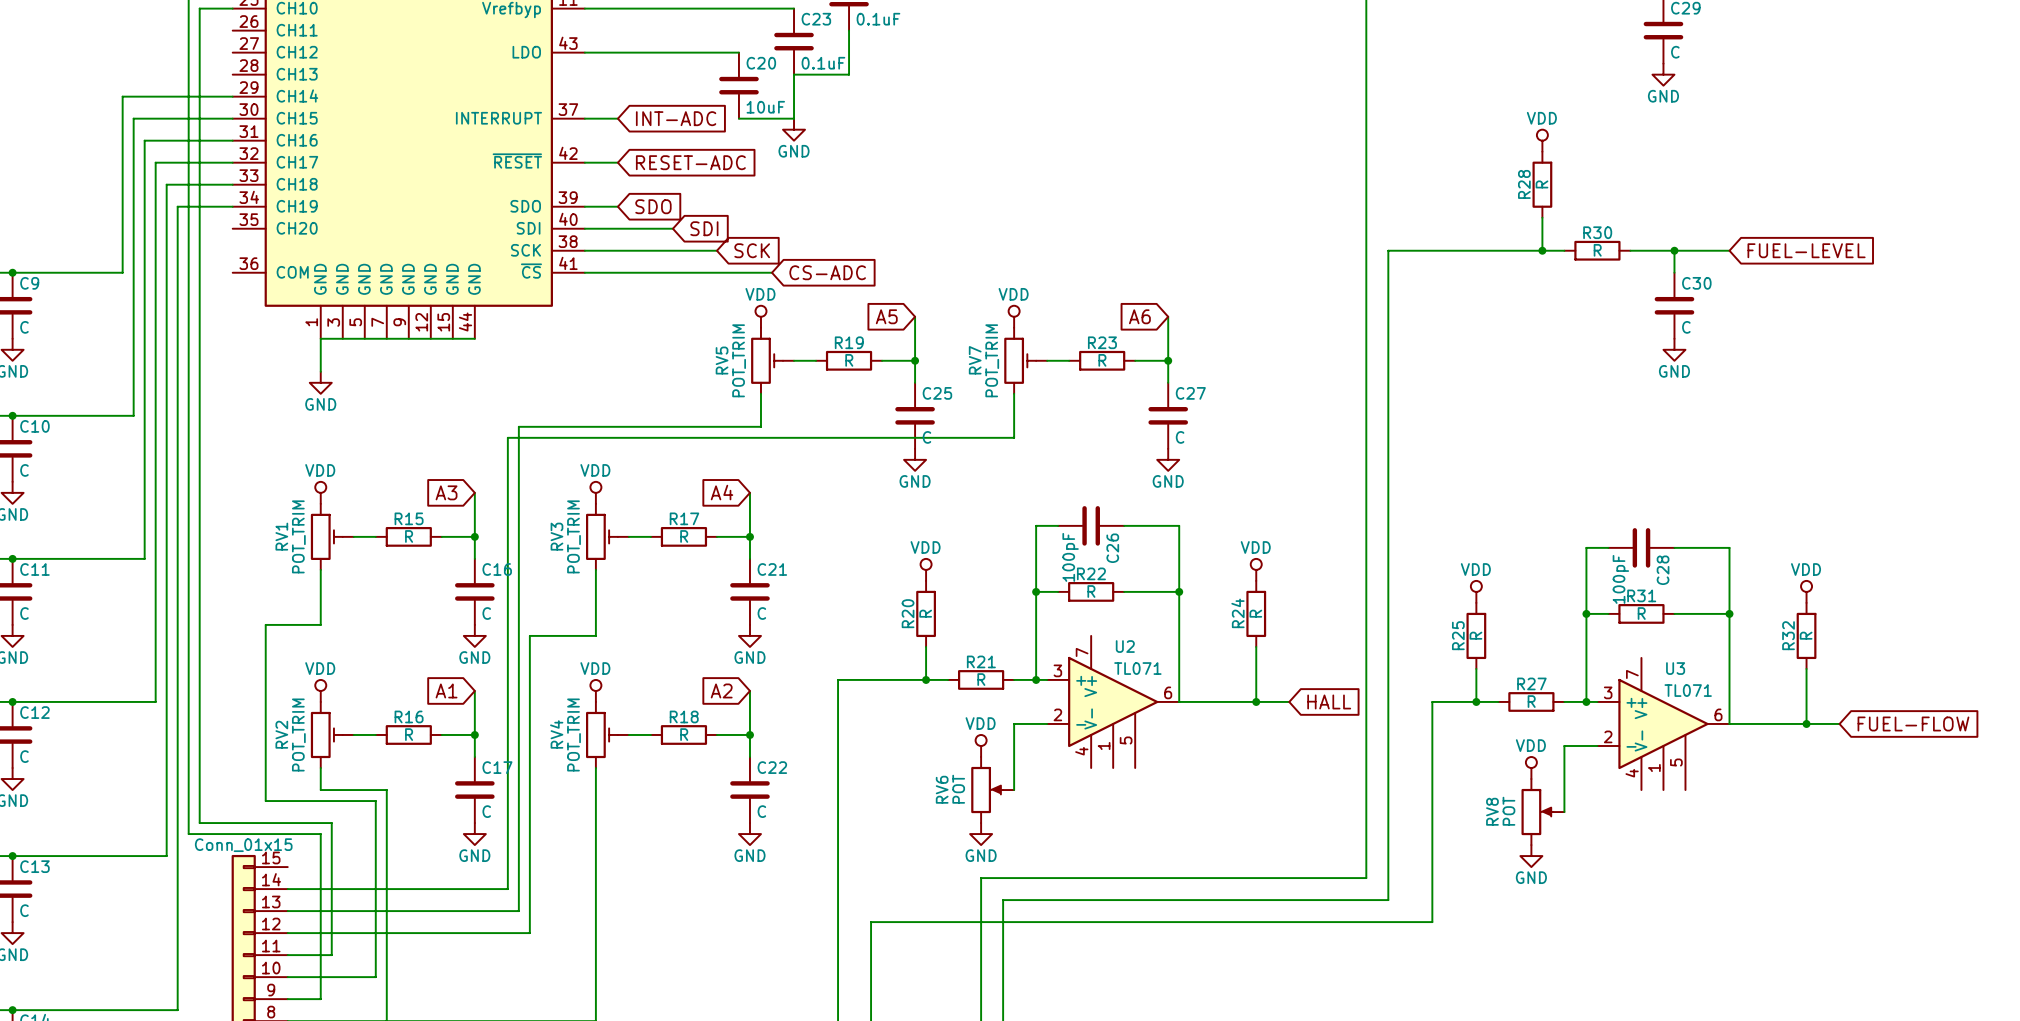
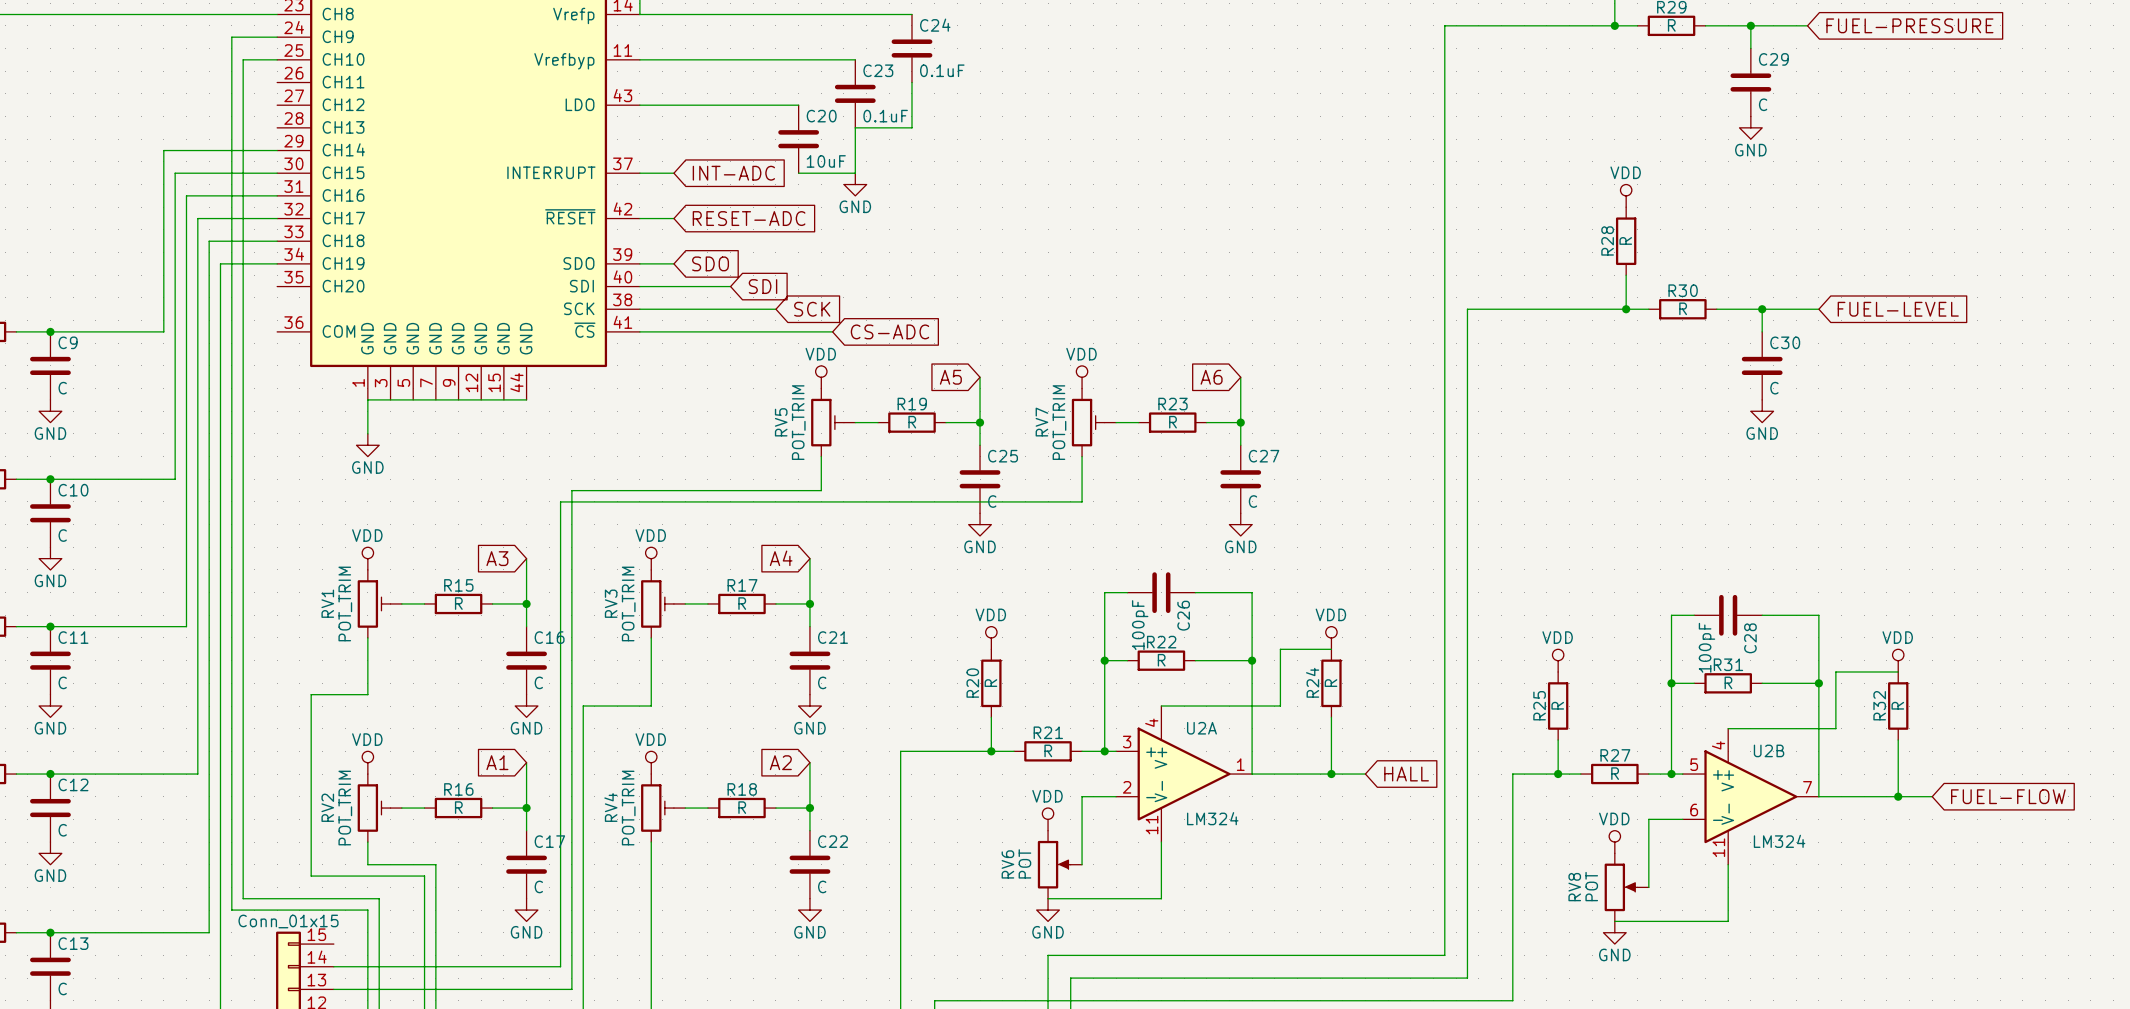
wire: none -> (1331, 649) (1280, 649) (1280, 706) (1161, 706)
wire: none -> (1898, 671) (1835, 671) (1835, 728) (1728, 728)
U2: TL071 (1113, 701) -> none
U2A: none -> LM324 (1184, 774)
U3: TL071 (1663, 723) -> none
U2B: none -> LM324 (1750, 796)
wire: none -> (1161, 842) (1161, 898) (1048, 898)
wire: none -> (1728, 864) (1728, 921) (1614, 921)

